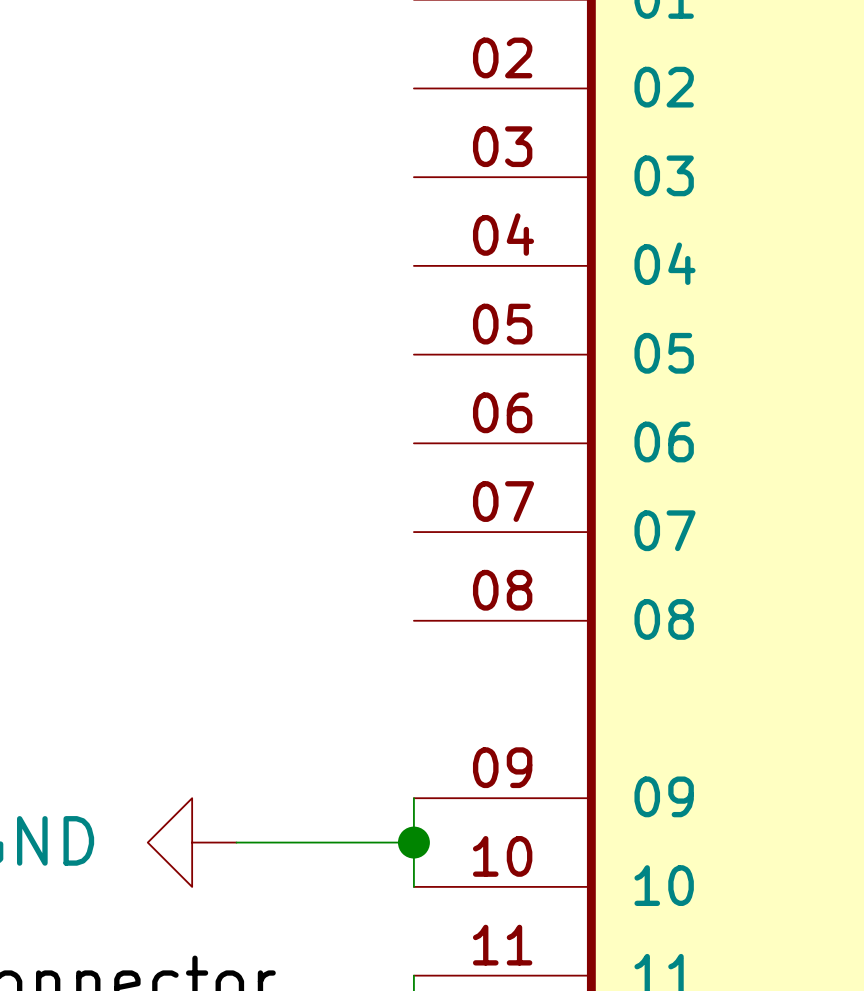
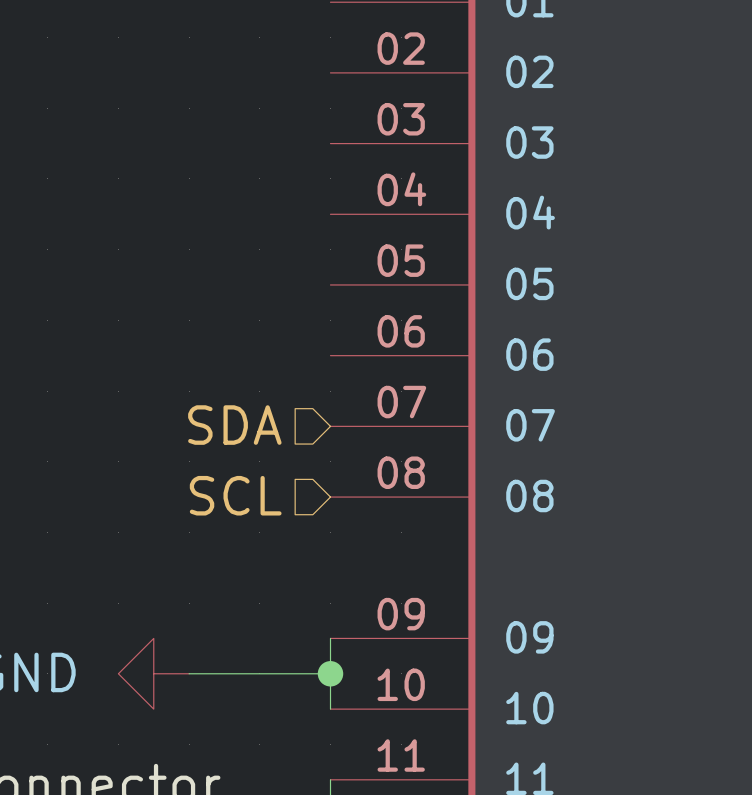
hierarchical label: none -> SDA (234, 425)
hierarchical label: none -> SCL (235, 495)

